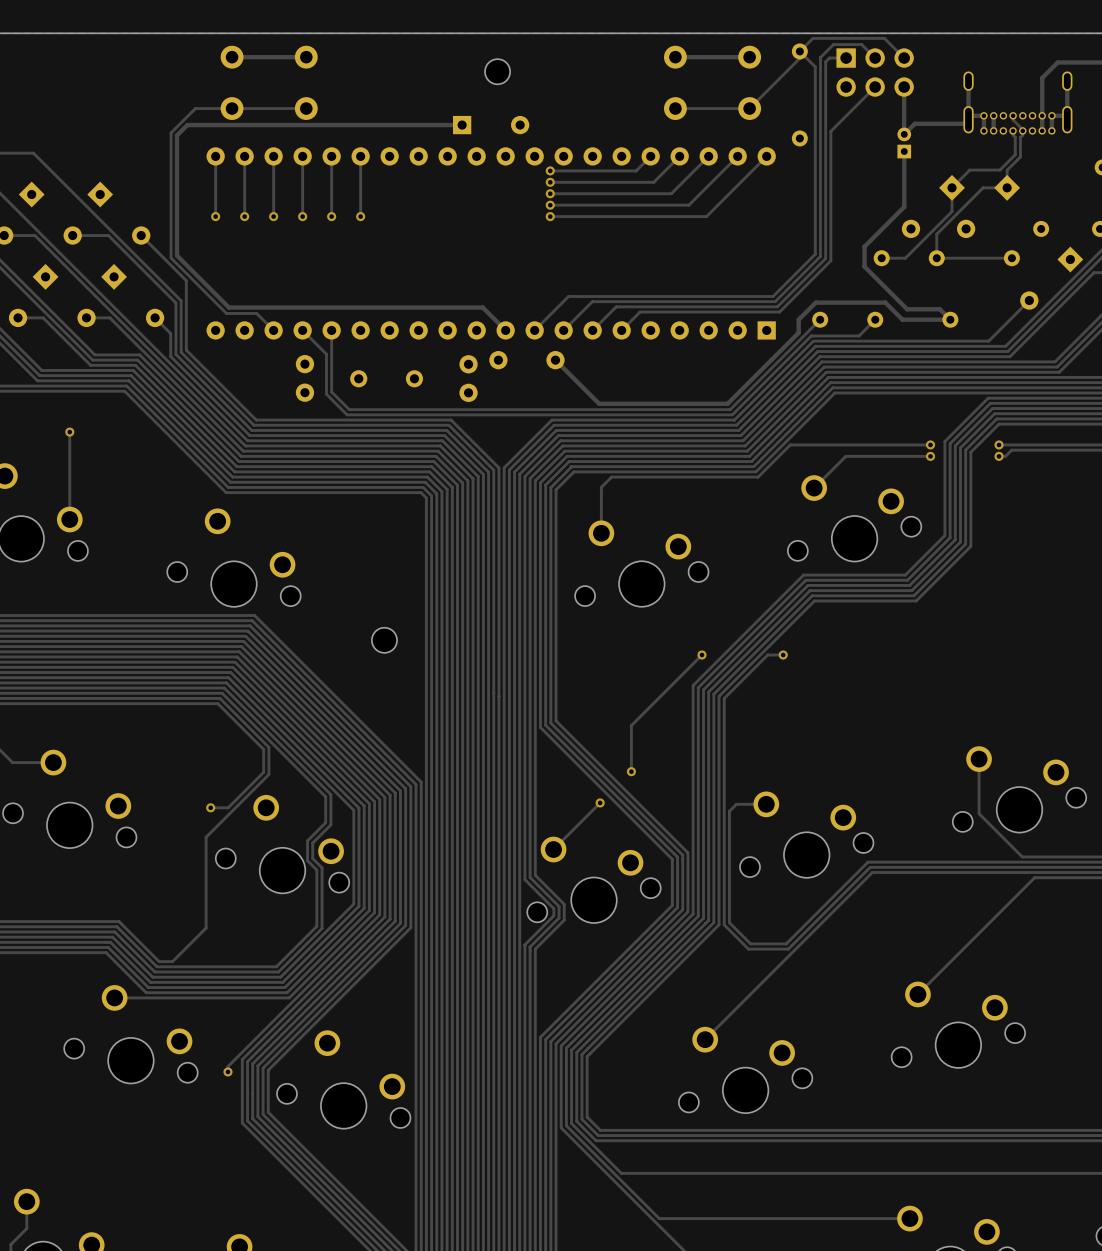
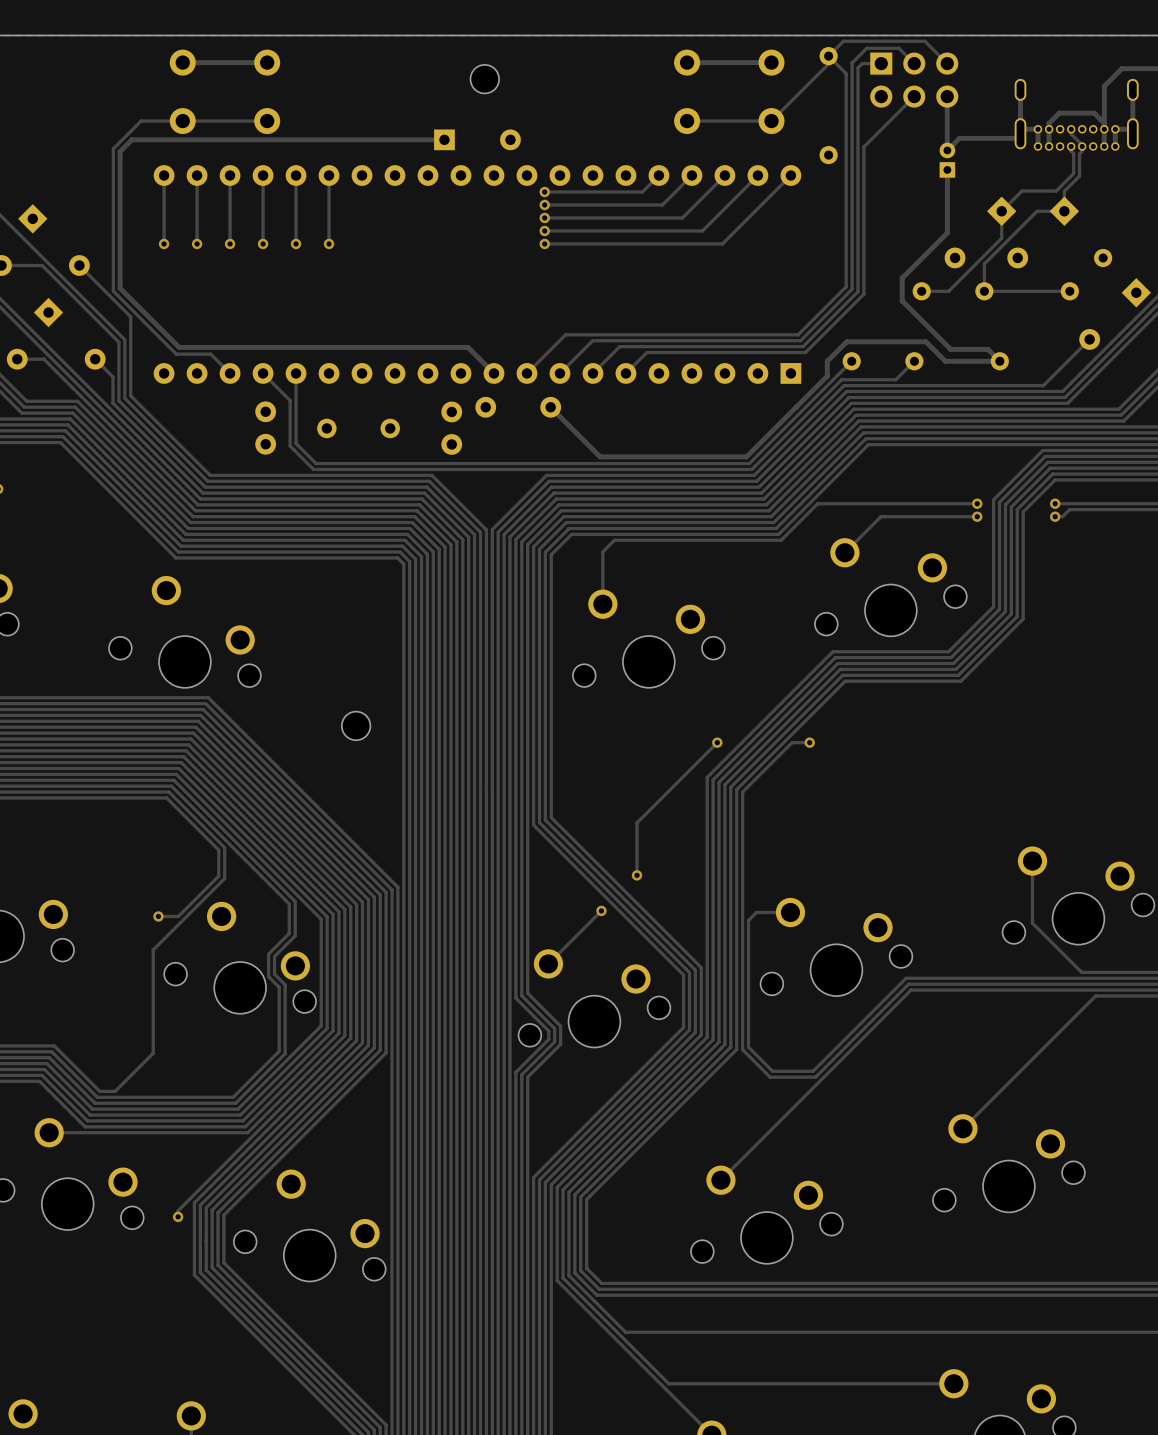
track: none -> (1104, 123) (1094, 113) (1059, 113) (1049, 123) (1049, 129)

